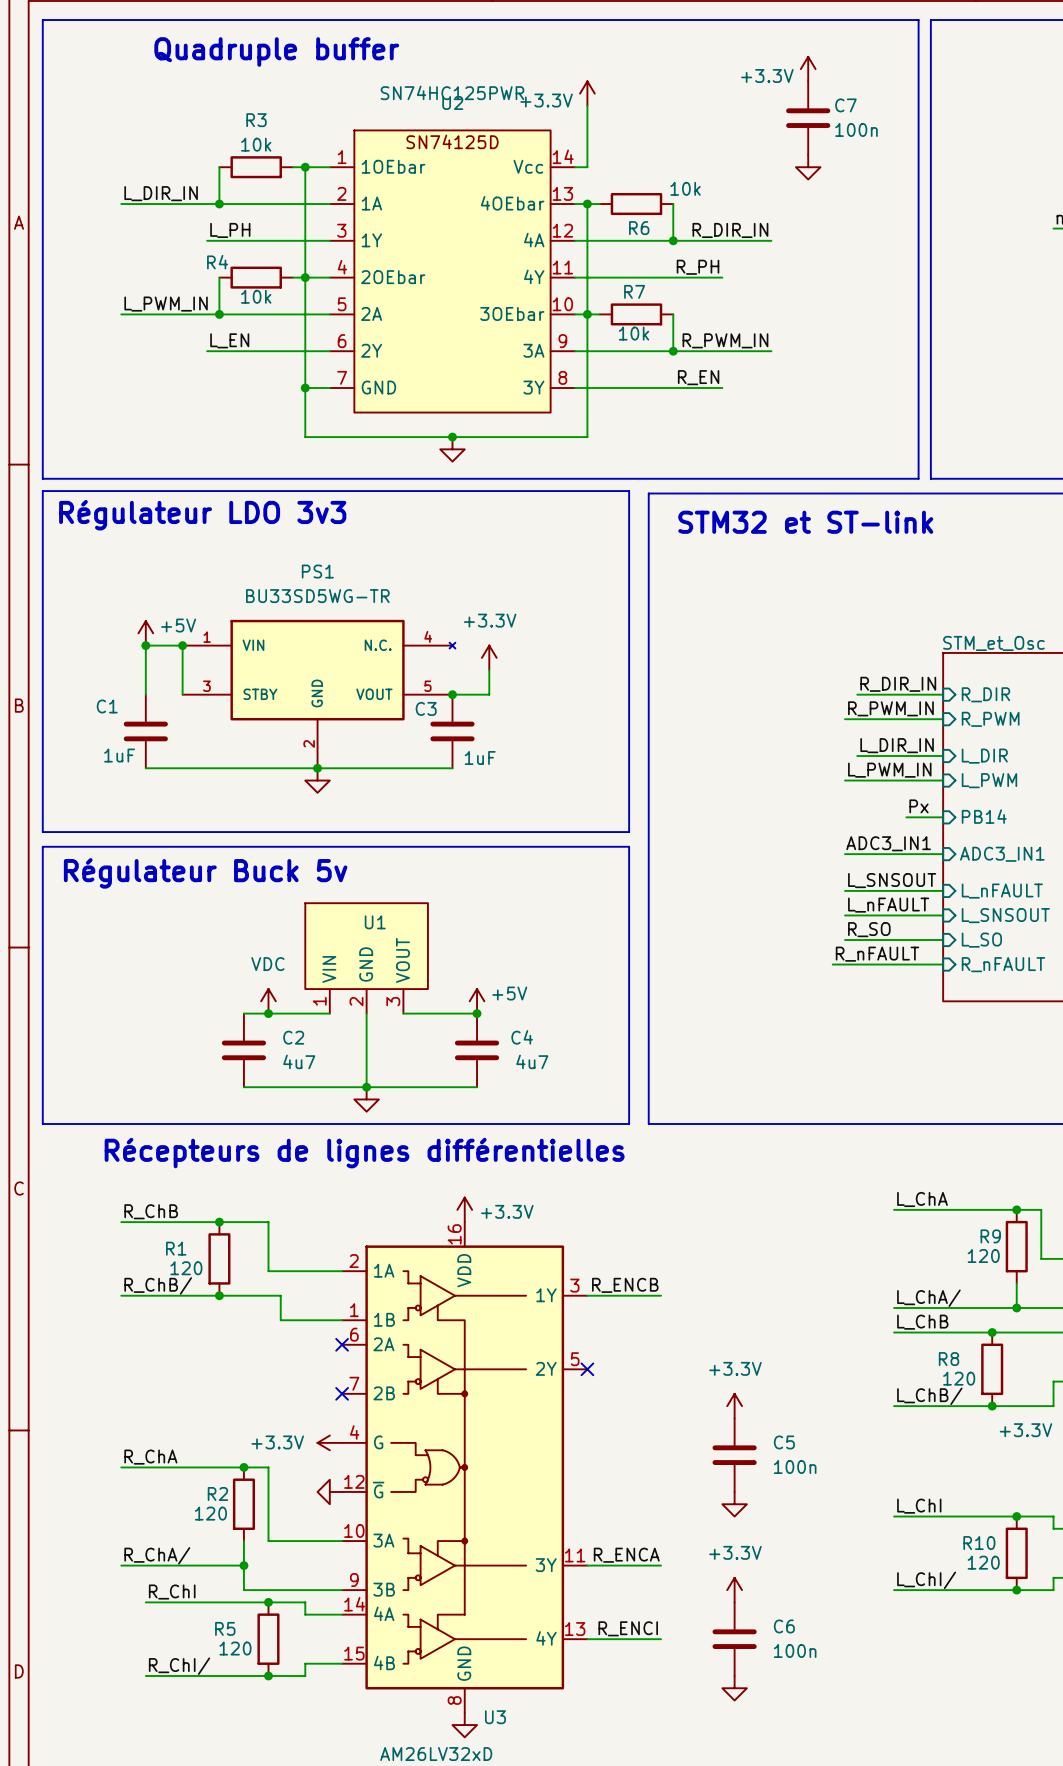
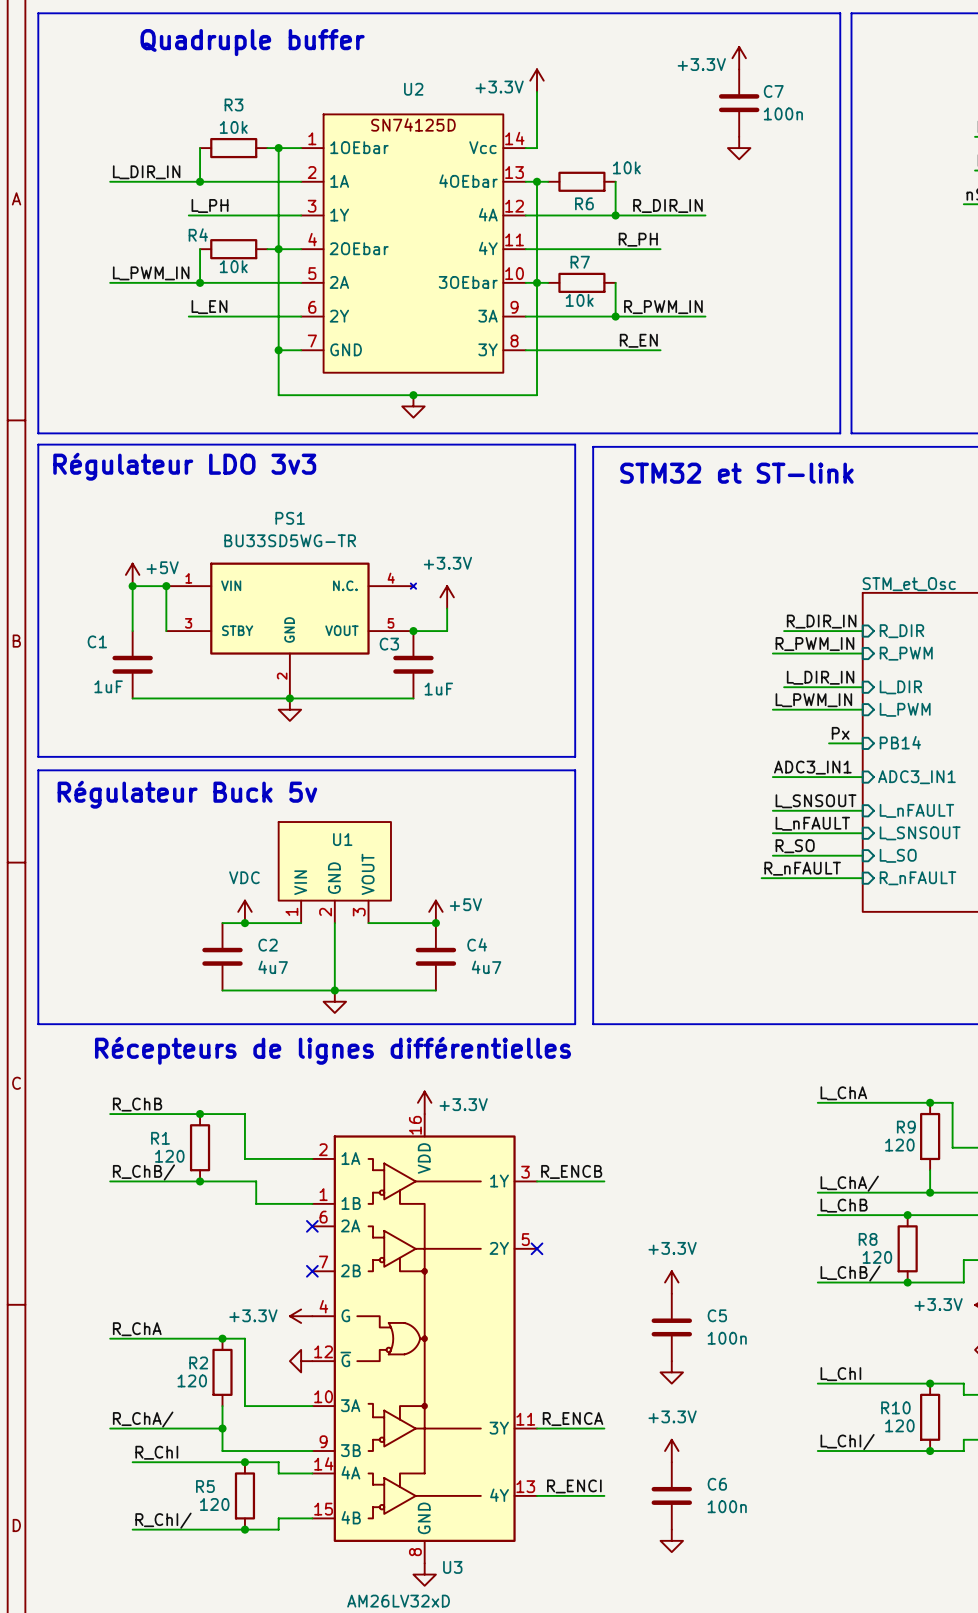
U2 value: SN74HC125PWR (452, 92) -> none

